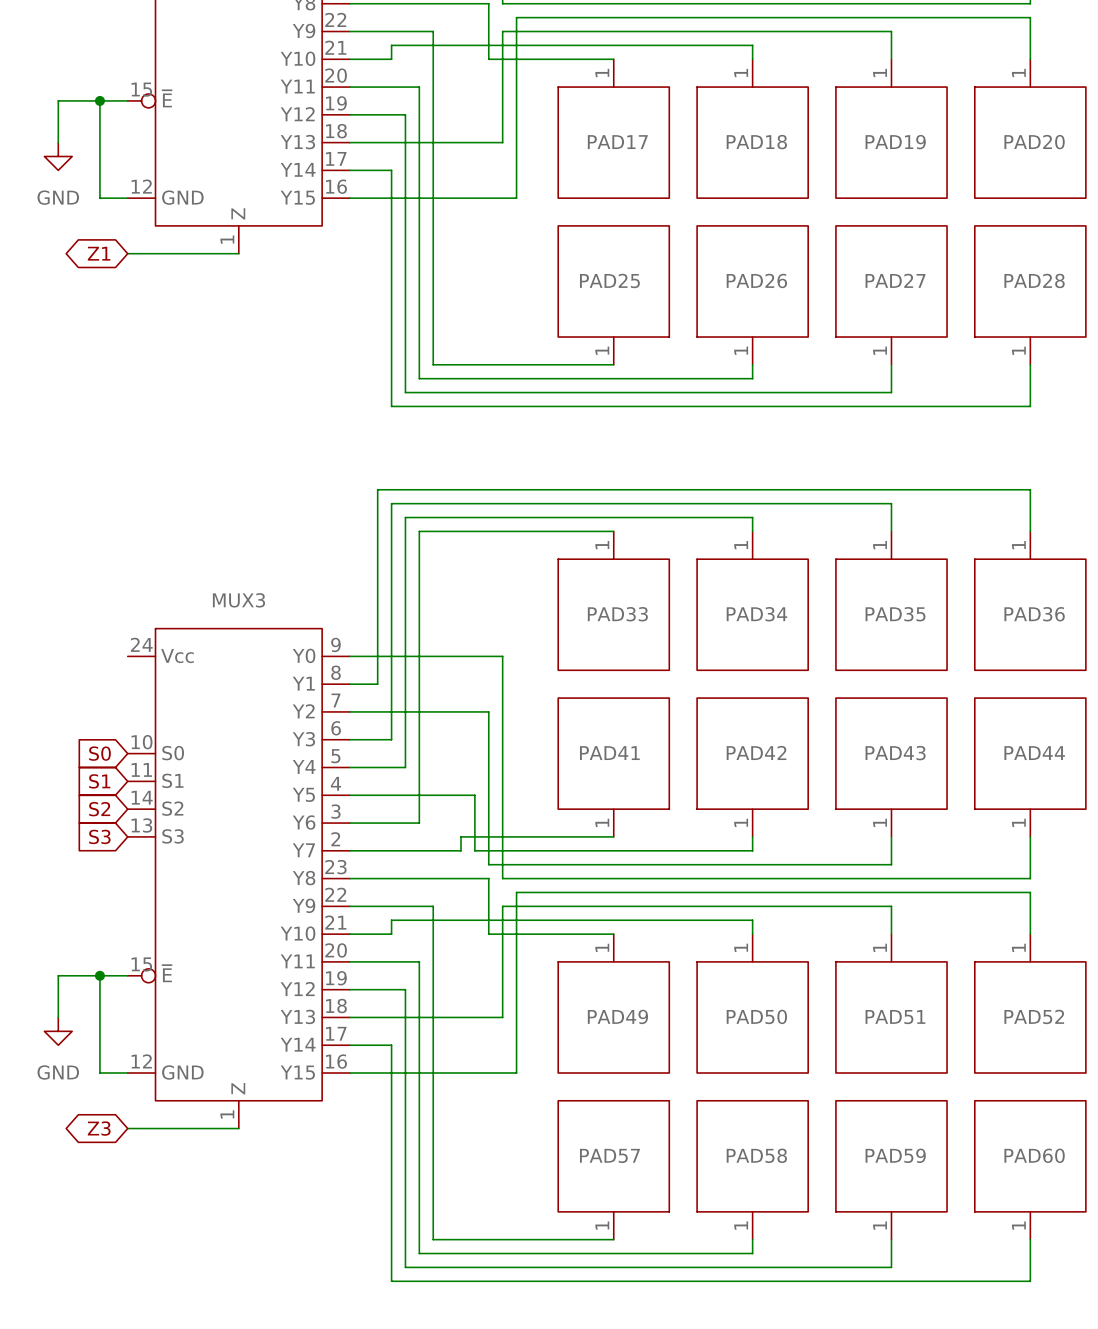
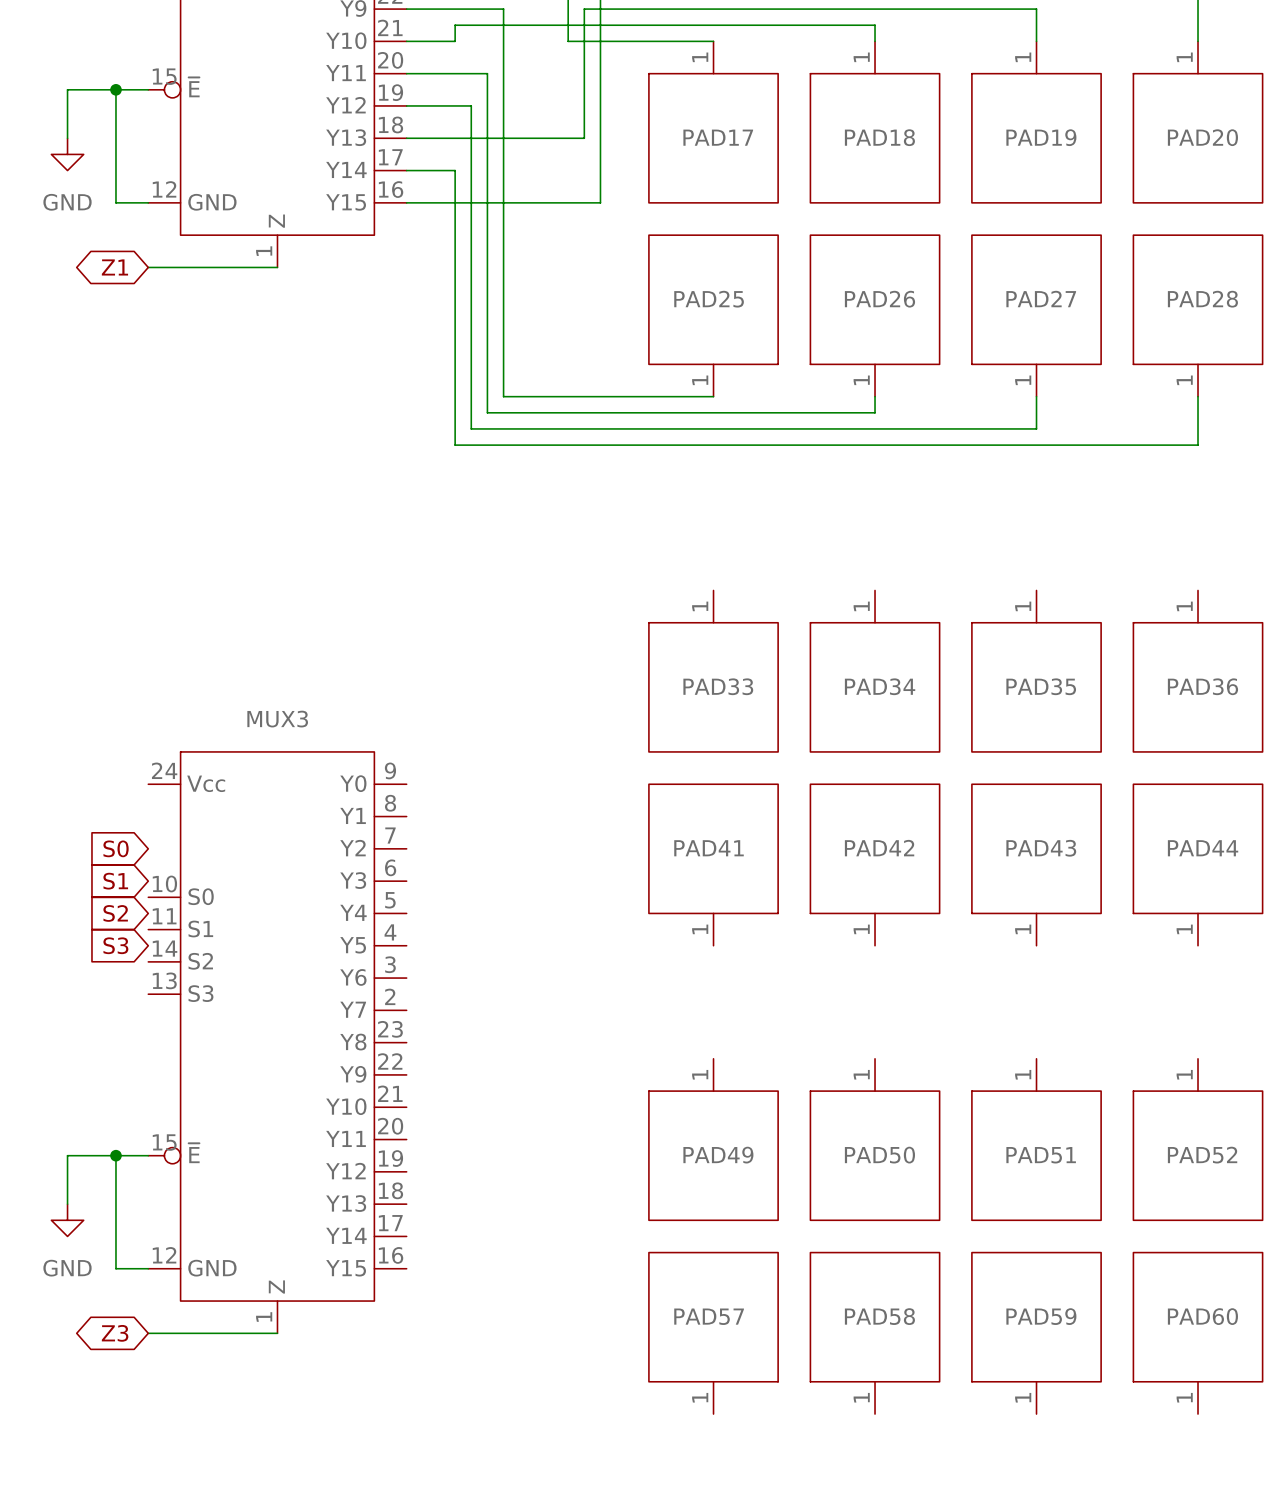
wire: (613, 531) (419, 531) (419, 823) (349, 823) -> none
wire: (752, 531) (752, 517) (405, 517) (405, 767) (349, 767) -> none
wire: (891, 531) (891, 503) (391, 503) (391, 739) (349, 739) -> none
wire: (1030, 531) (1030, 489) (377, 489) (377, 684) (349, 684) -> none
wire: (349, 656) (502, 656) (502, 878) (1030, 878) (1030, 836) -> none
wire: (349, 711) (488, 711) (488, 864) (891, 864) (891, 836) -> none
wire: (349, 795) (474, 795) (474, 850) (752, 850) (752, 836) -> none
wire: (613, 836) (461, 836) (461, 850) (349, 850) -> none
MUX3 position: (238, 878) -> (277, 1042)
wire: (349, 878) (488, 878) (488, 934) (613, 934) -> none
wire: (349, 906) (433, 906) (433, 1239) (613, 1239) -> none
wire: (349, 934) (391, 934) (391, 920) (752, 920) (752, 934) -> none
wire: (891, 934) (891, 906) (502, 906) (502, 1017) (349, 1017) -> none
wire: (1030, 934) (1030, 892) (516, 892) (516, 1073) (349, 1073) -> none
wire: (349, 961) (419, 961) (419, 1253) (752, 1253) (752, 1239) -> none
wire: (99, 975) (99, 1017) -> none
junction position: (99, 975) -> (115, 1155)
wire: (127, 975) (58, 975) (58, 1017) -> (148, 1155) (67, 1155) (67, 1204)
wire: (349, 989) (405, 989) (405, 1267) (891, 1267) (891, 1239) -> none
power symbol position: GND (58, 1031) -> GND (67, 1220)
wire: (349, 1045) (391, 1045) (391, 1281) (1030, 1281) (1030, 1239) -> none
wire: (99, 1073) (127, 1073) -> (115, 1220) (115, 1268) (148, 1268)
global label position: Z3 (99, 1128) -> Z3 (115, 1333)
wire: (127, 1128) (238, 1128) -> (148, 1333) (277, 1333)

